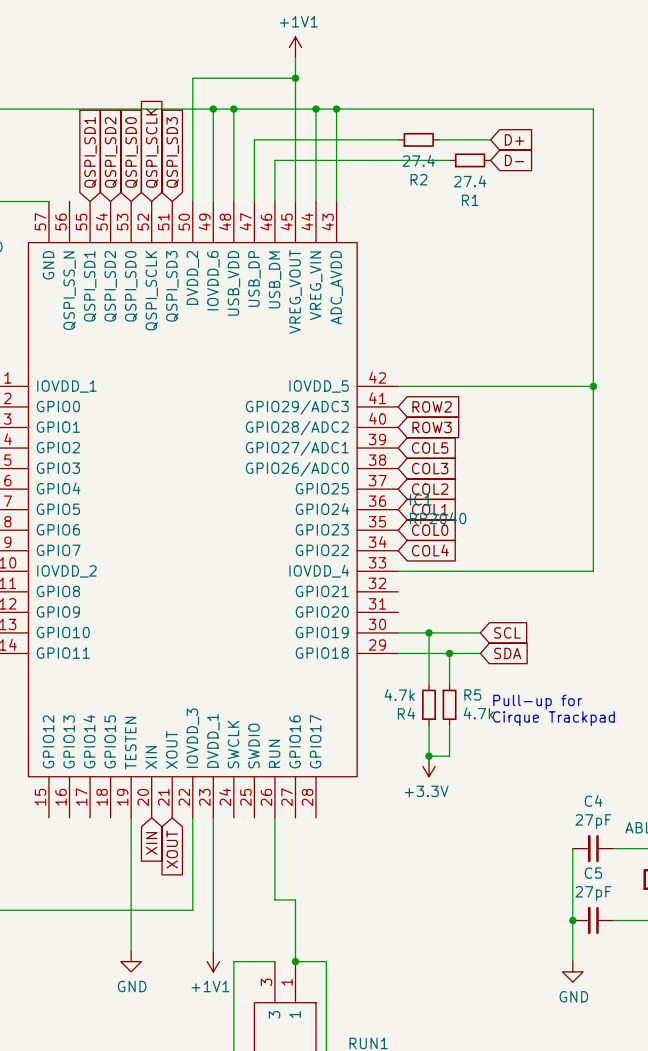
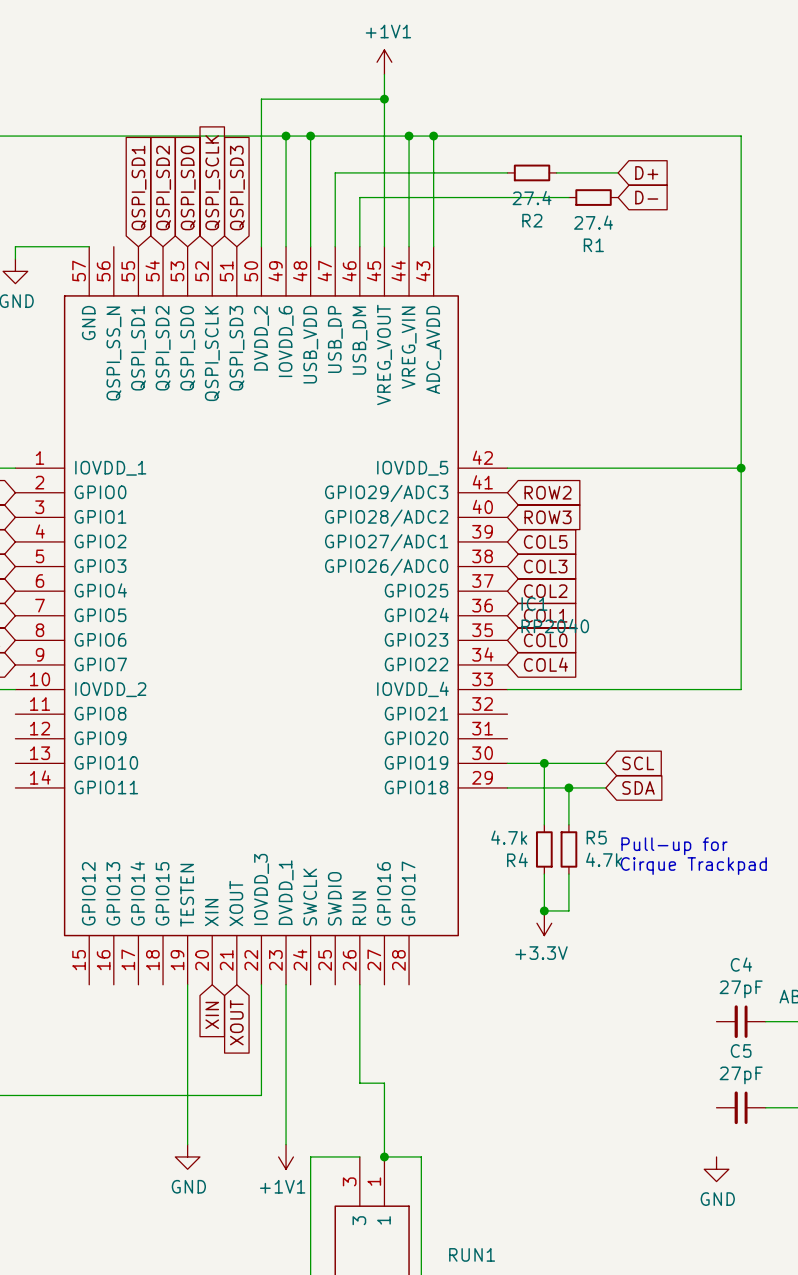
wire: (572, 848) (572, 961) -> none
junction: (572, 920) -> none

